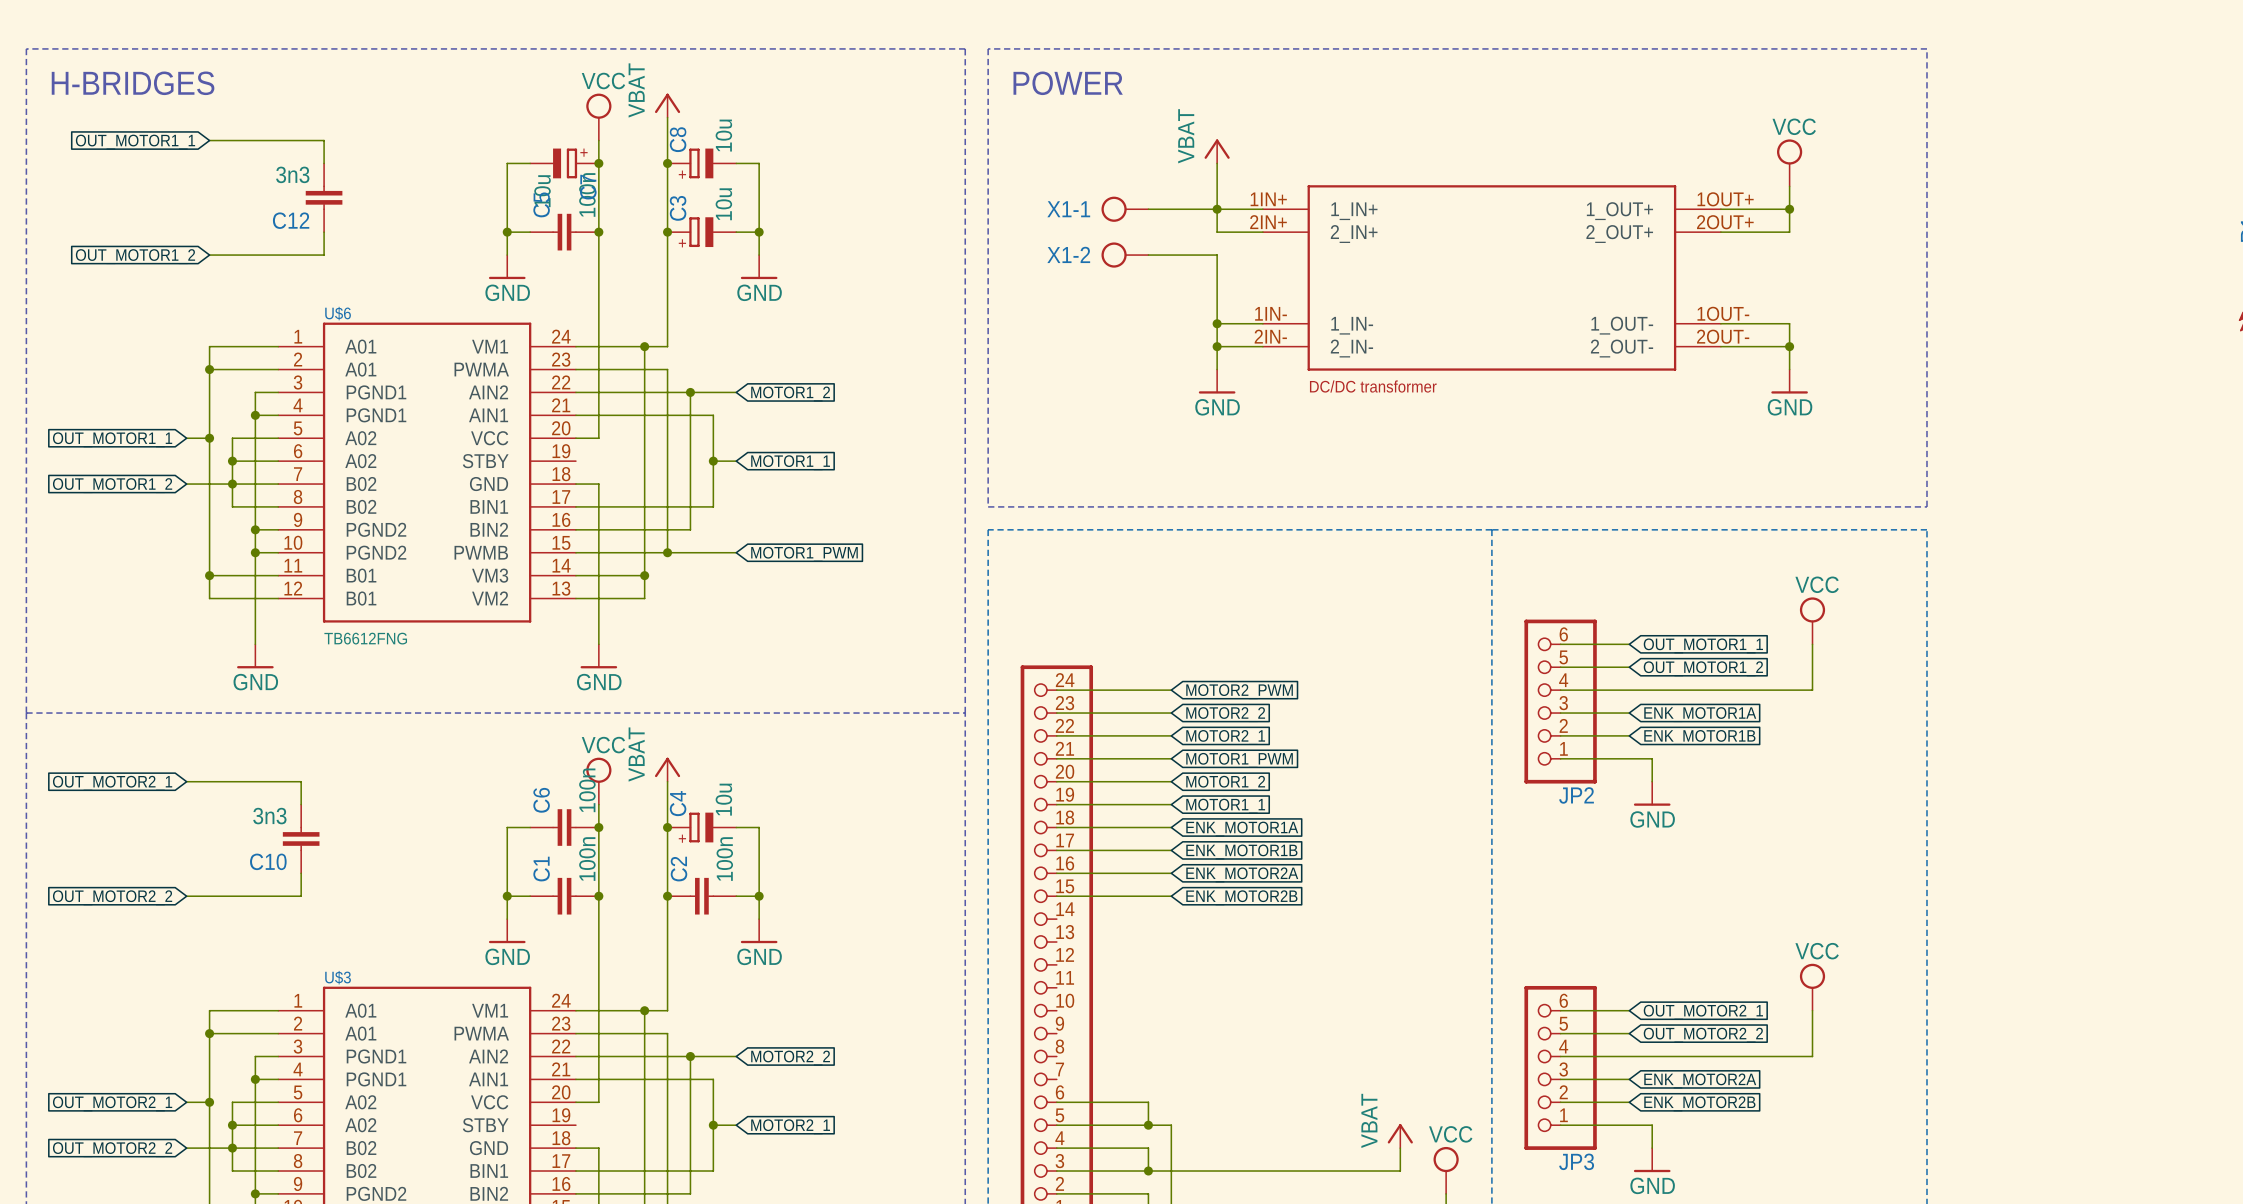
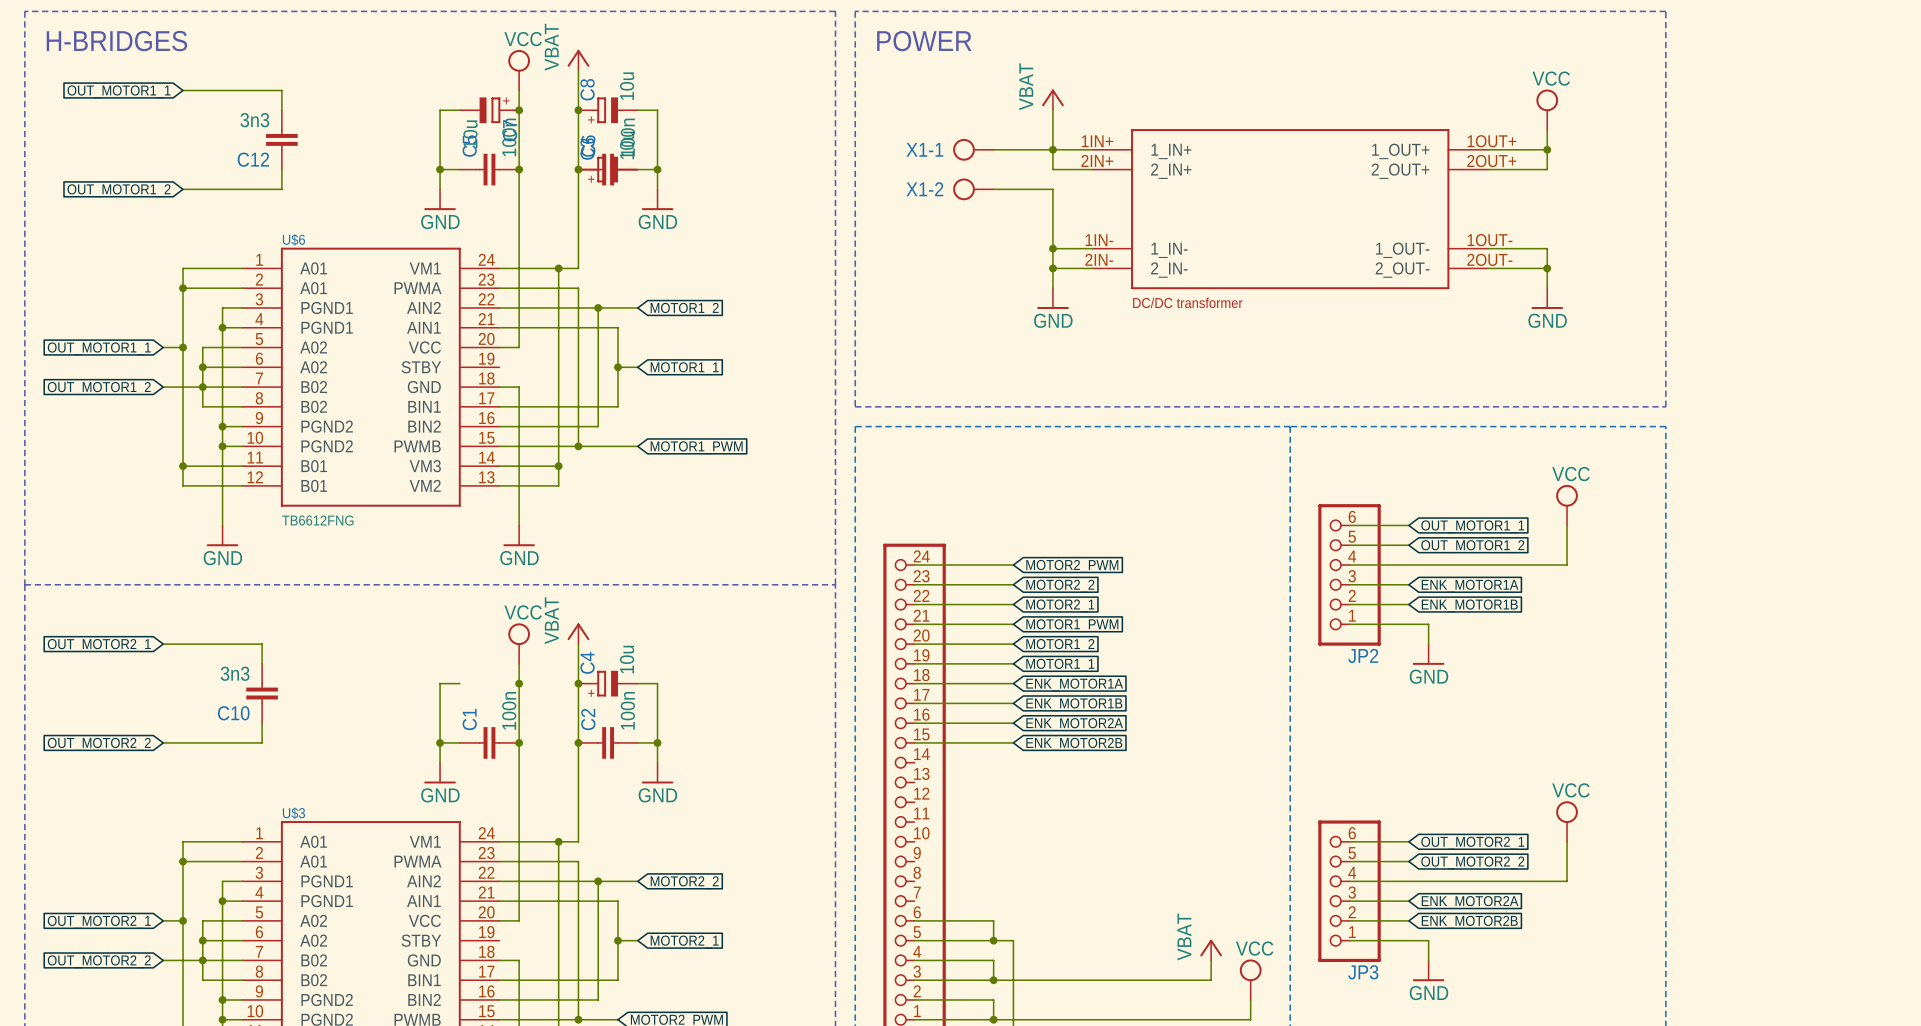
C6 position: (564, 827) -> (608, 169)

